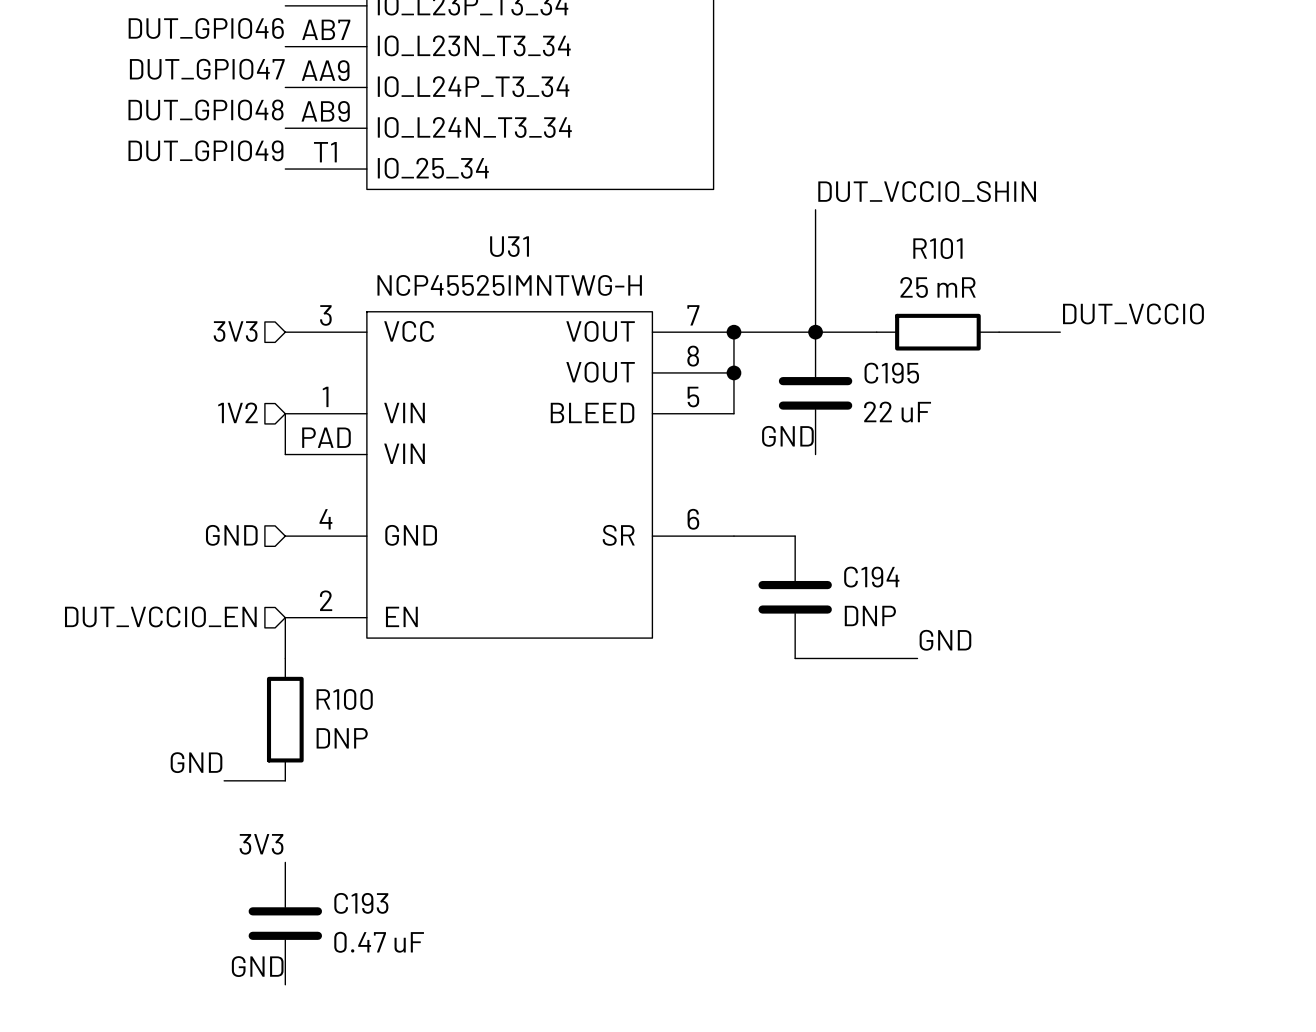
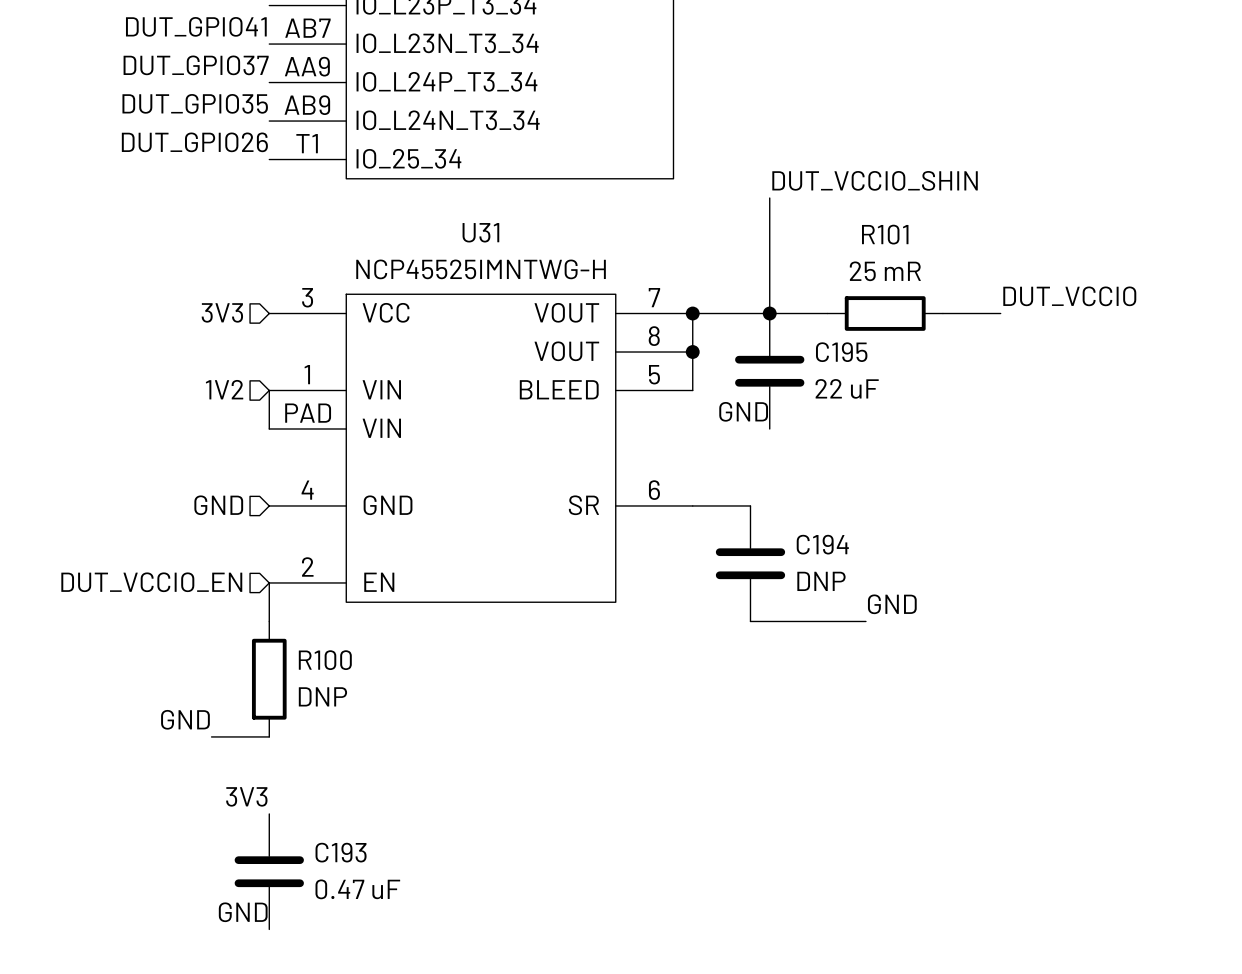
label: DUT_GPIO46 (206, 28) -> DUT_GPIO41 (196, 26)
label: DUT_GPIO47 (207, 69) -> DUT_GPIO37 (196, 65)
label: DUT_GPIO48 (206, 110) -> DUT_GPIO35 (195, 103)
label: DUT_GPIO49 (205, 150) -> DUT_GPIO26 (194, 142)

